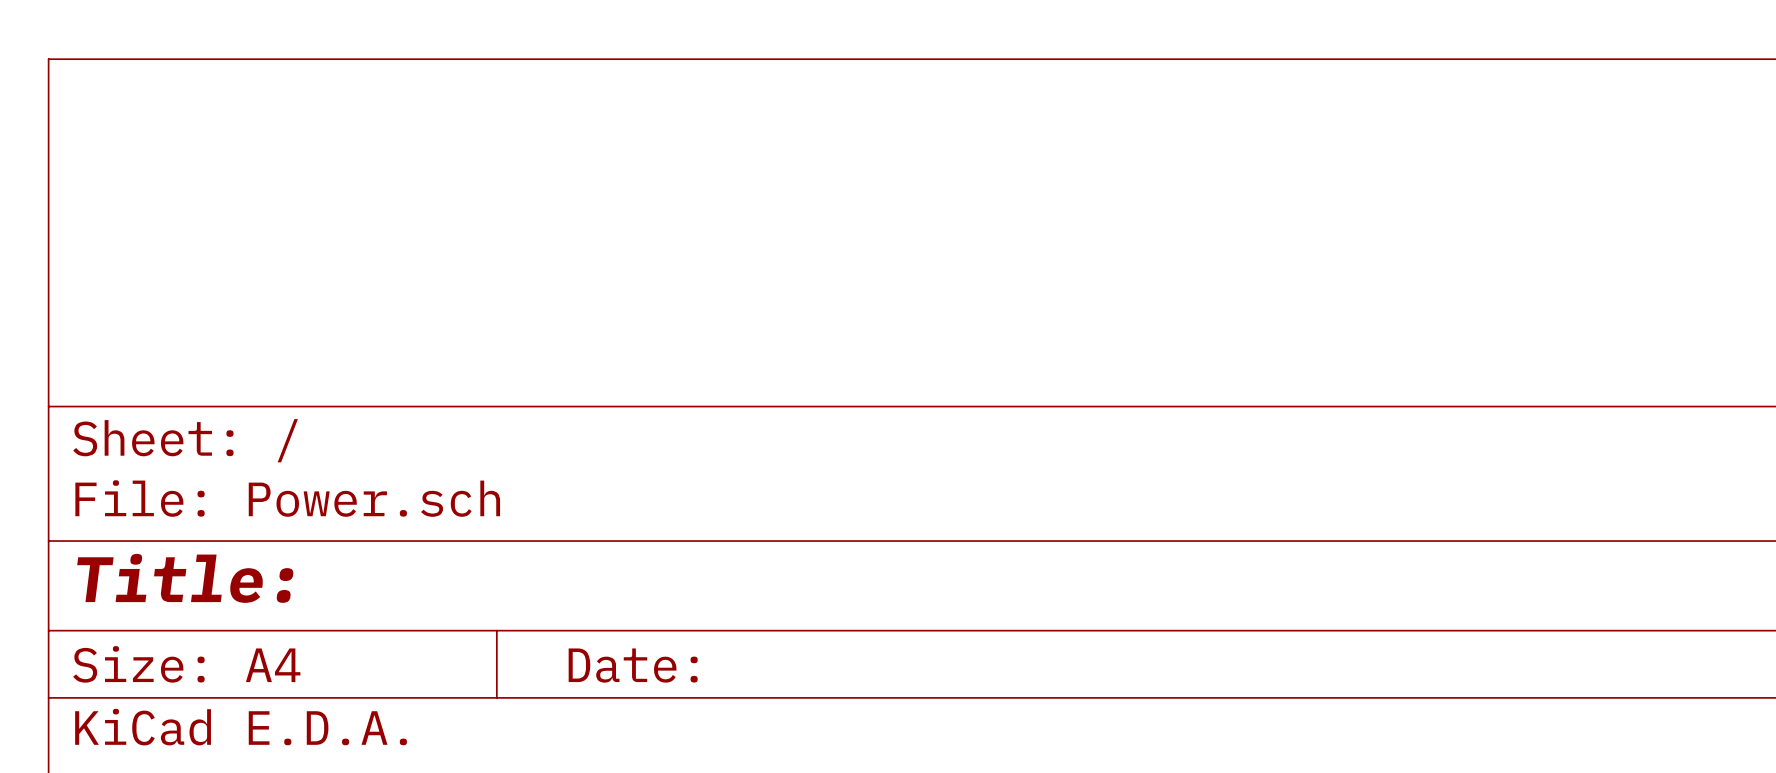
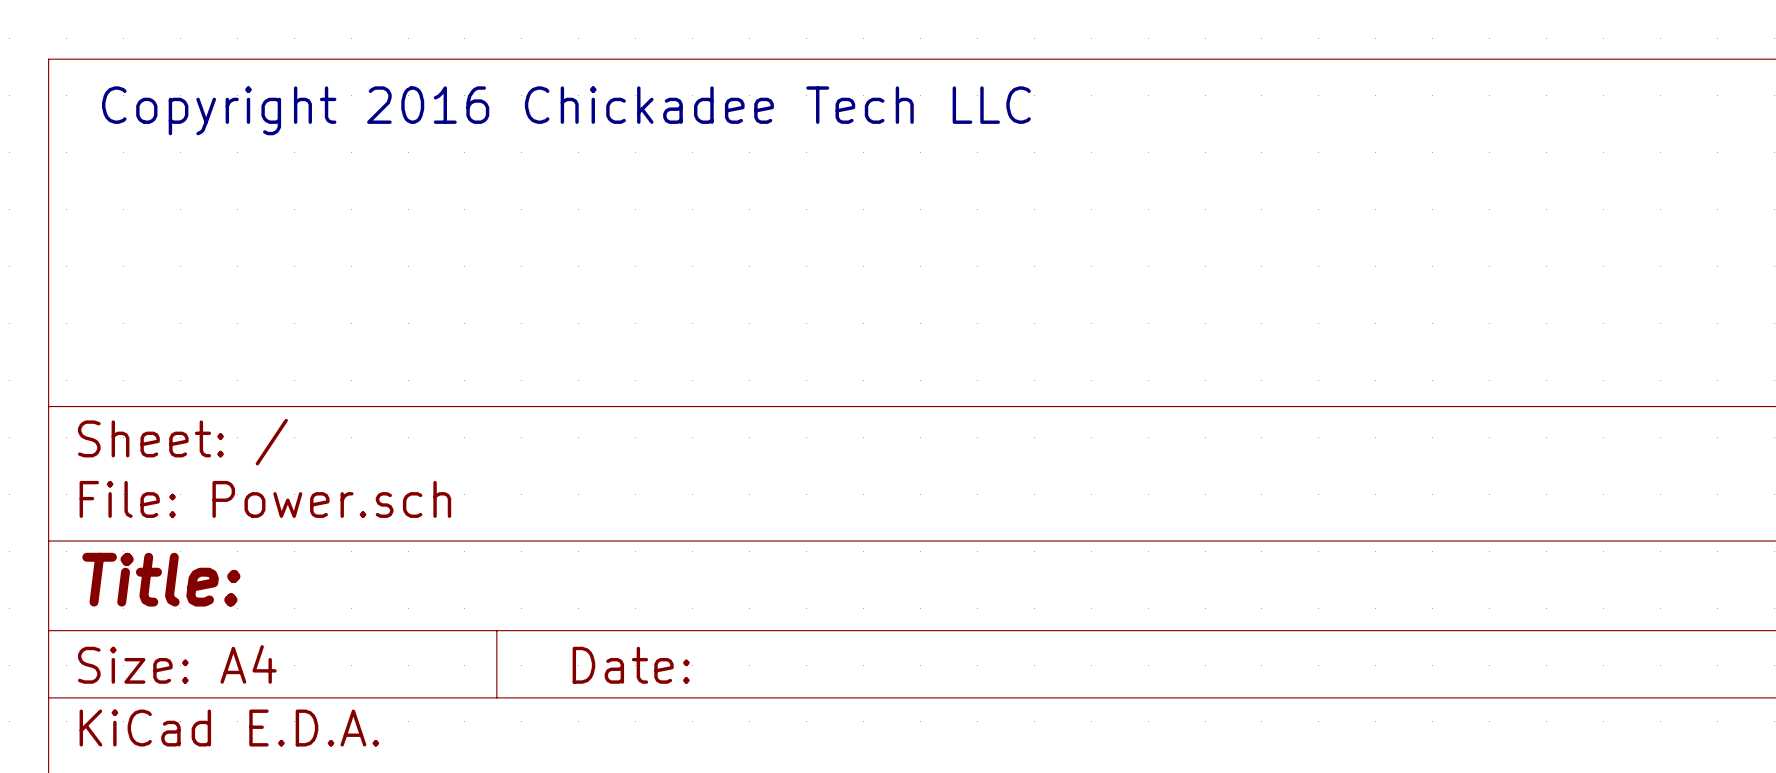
text: none -> Copyright 2016 Chickadee Tech LLC (566, 110)

